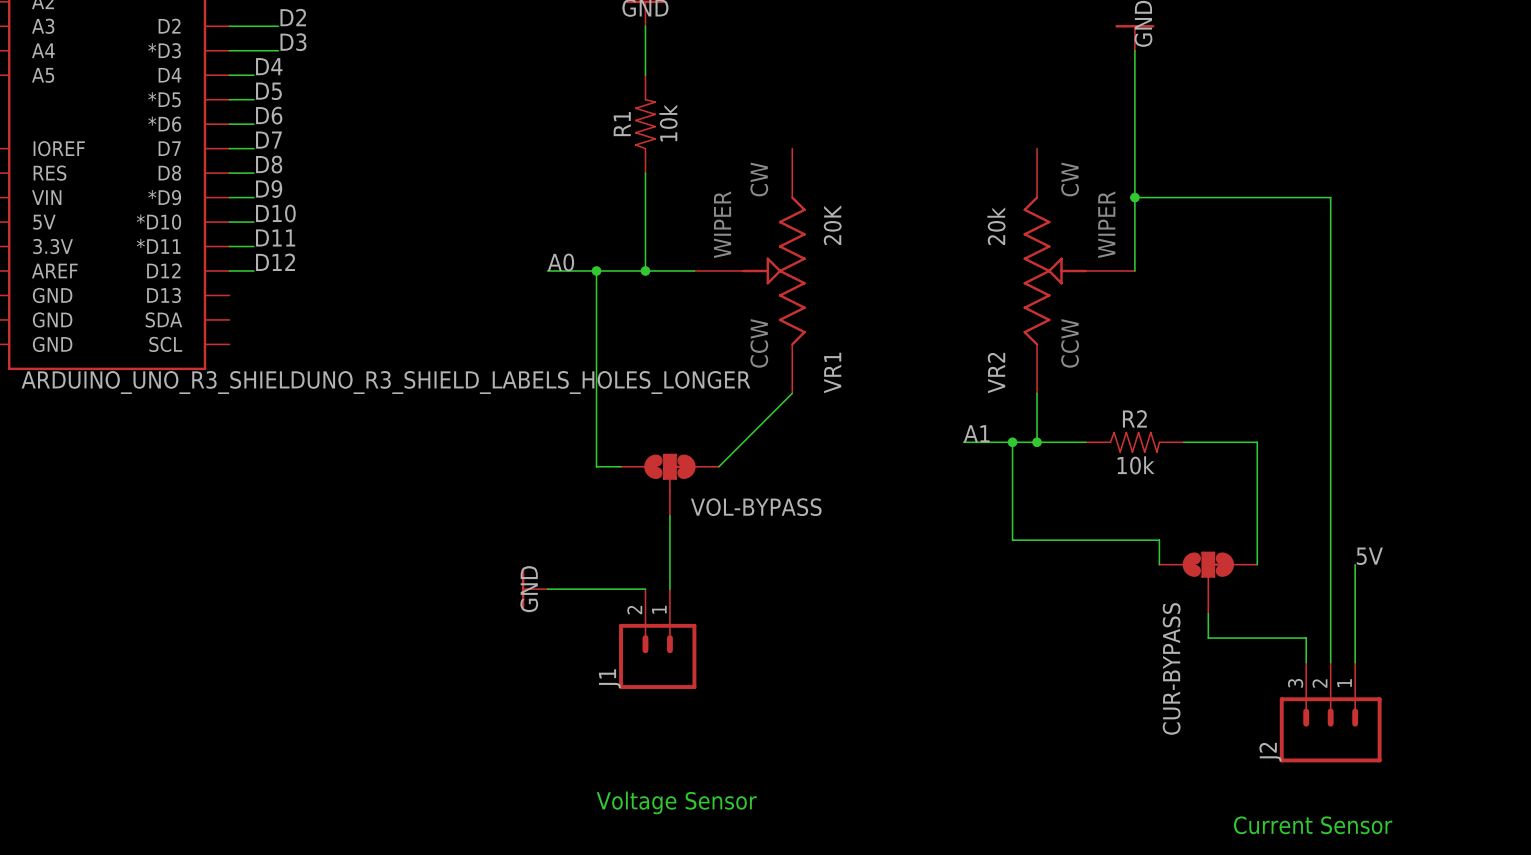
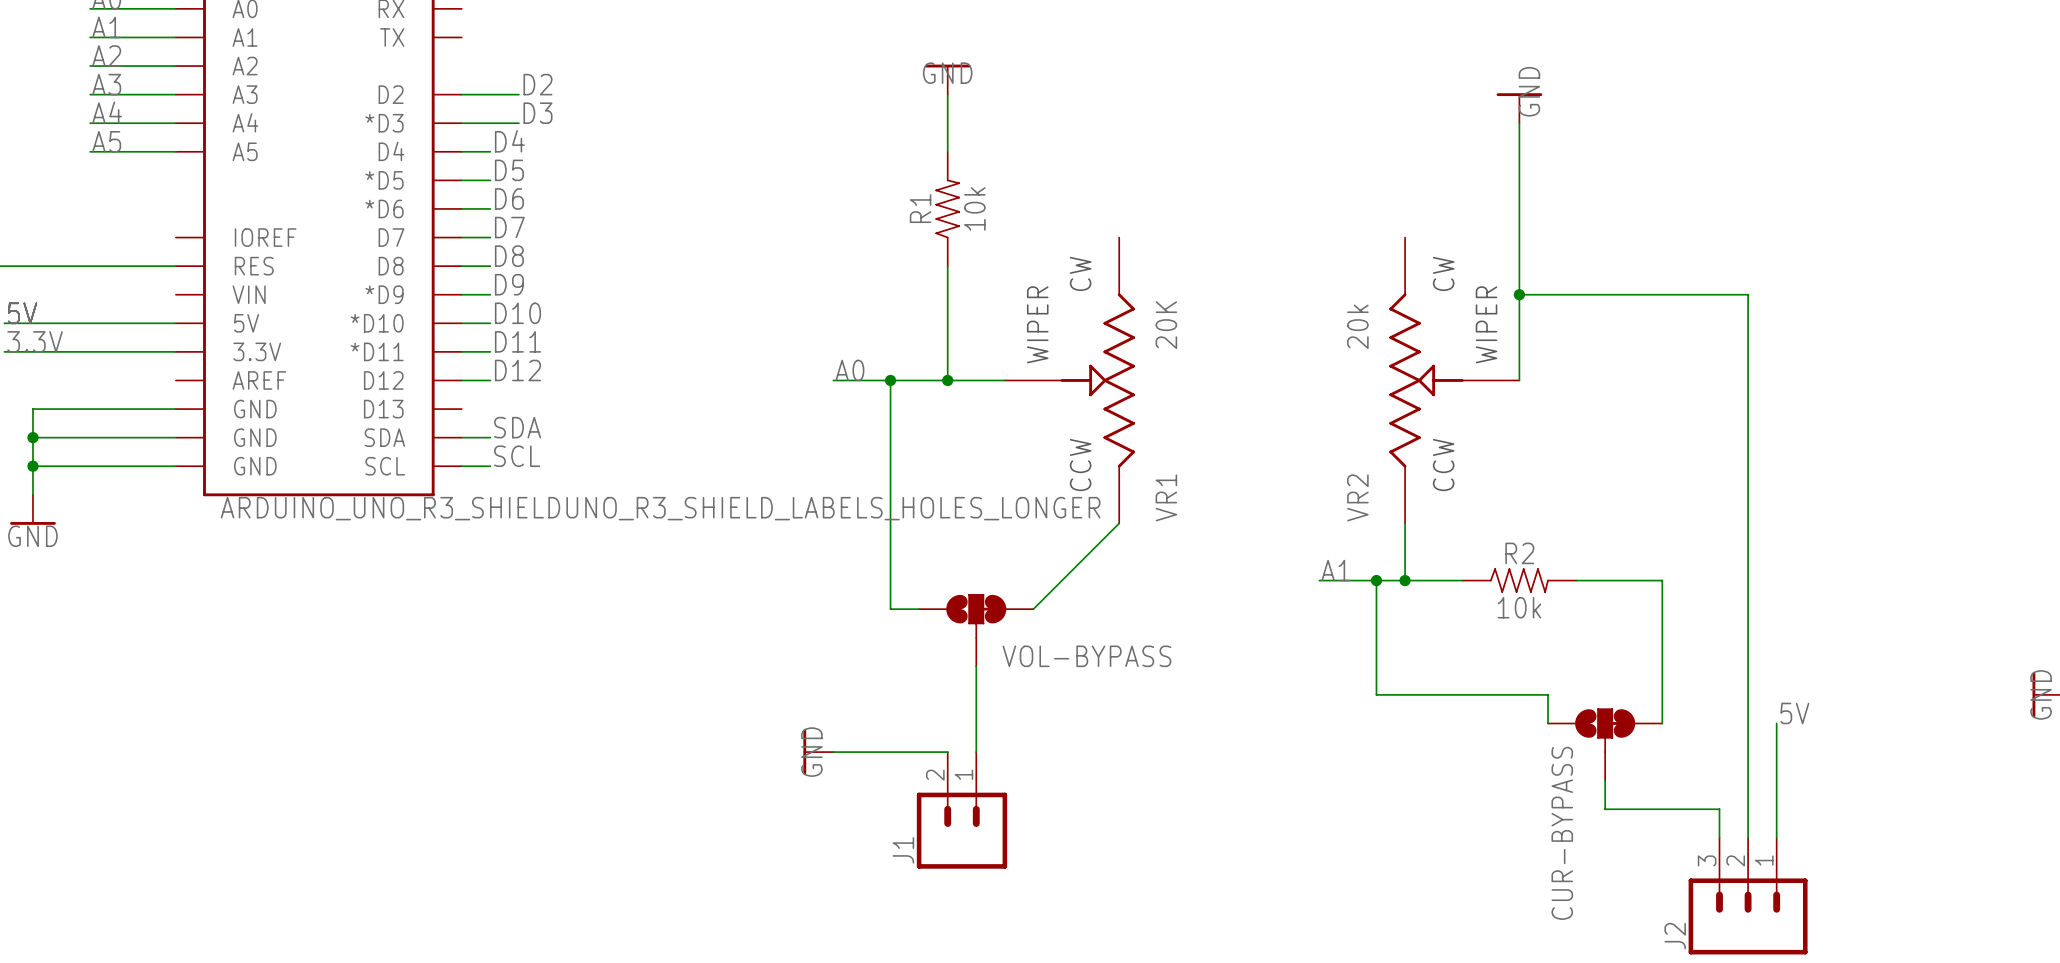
label: none -> SDA (517, 427)
wire: none -> (461, 437) (490, 437)
label: none -> SCL (517, 456)
wire: none -> (461, 466) (490, 466)

